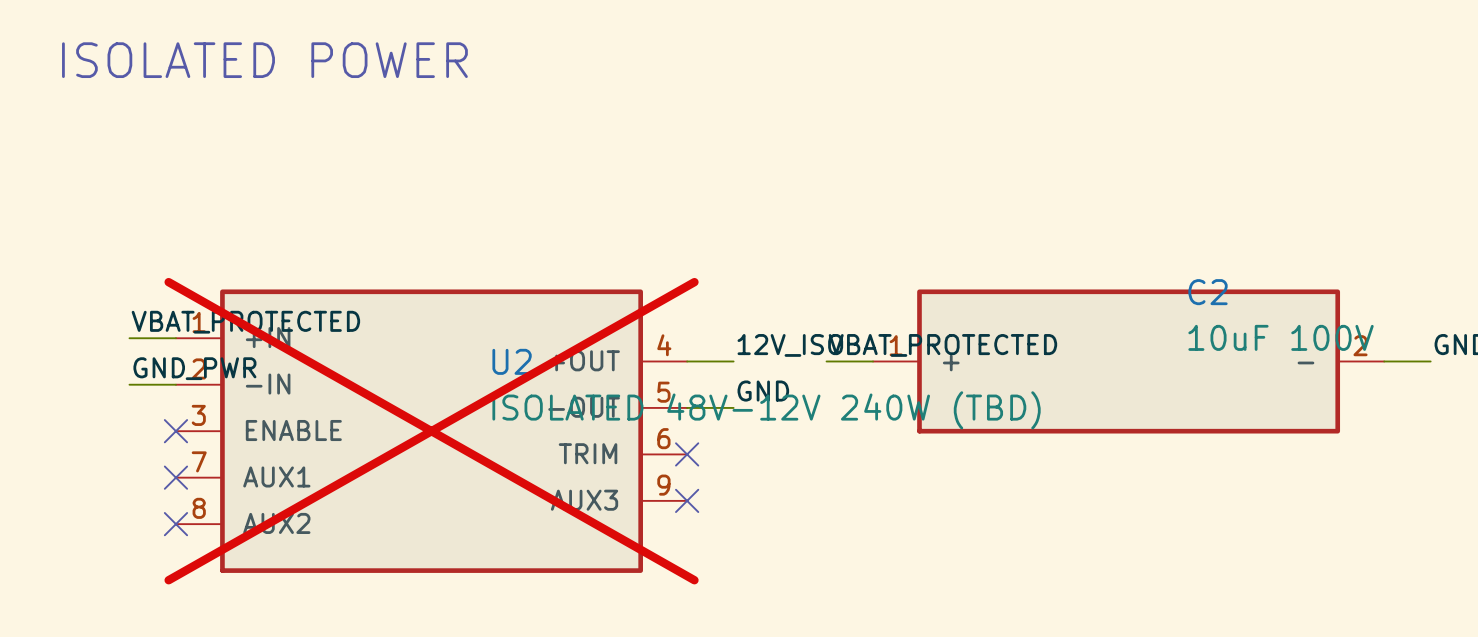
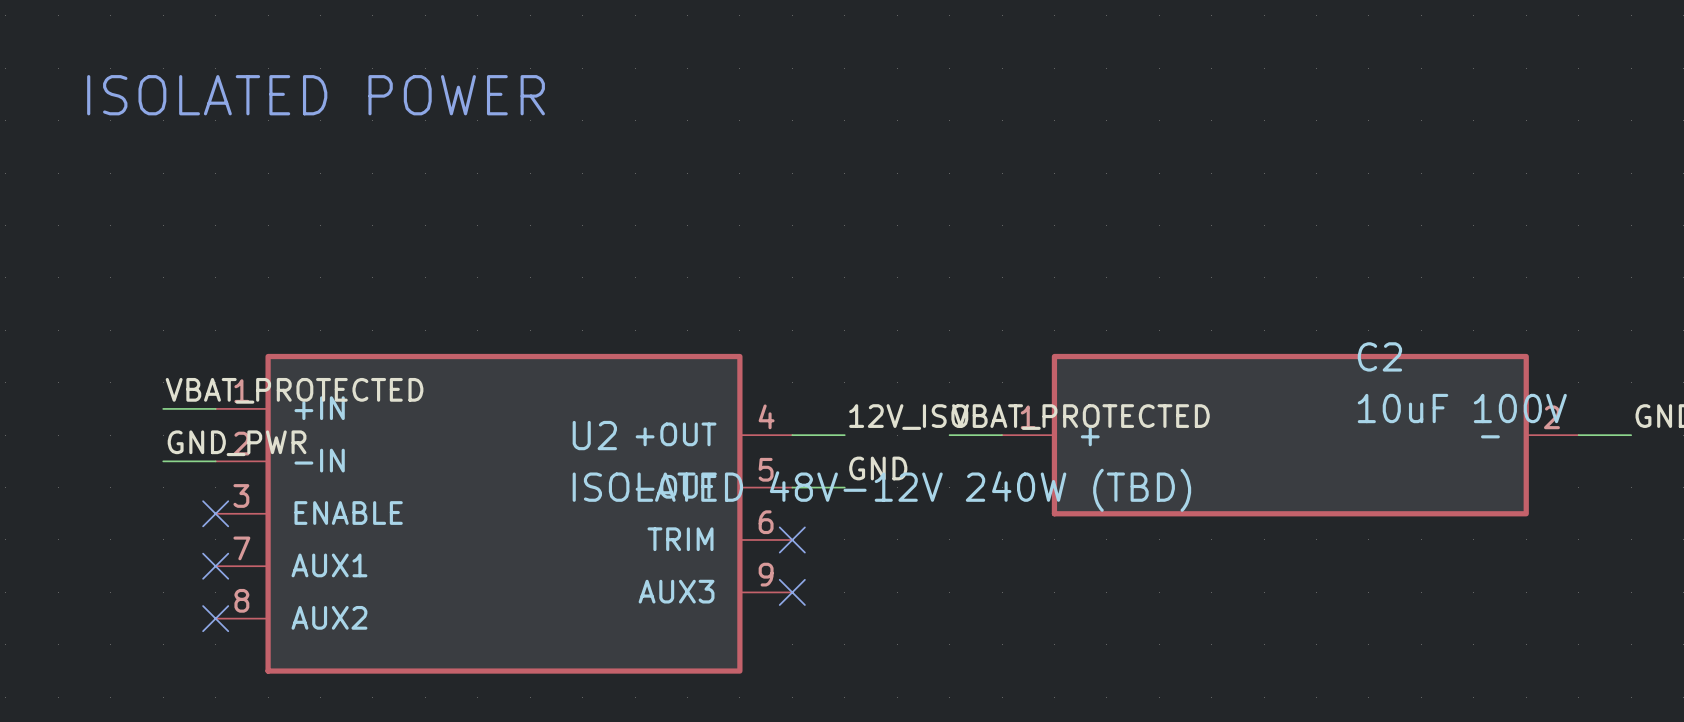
U2 do-not-place cross: (431, 431) -> none

